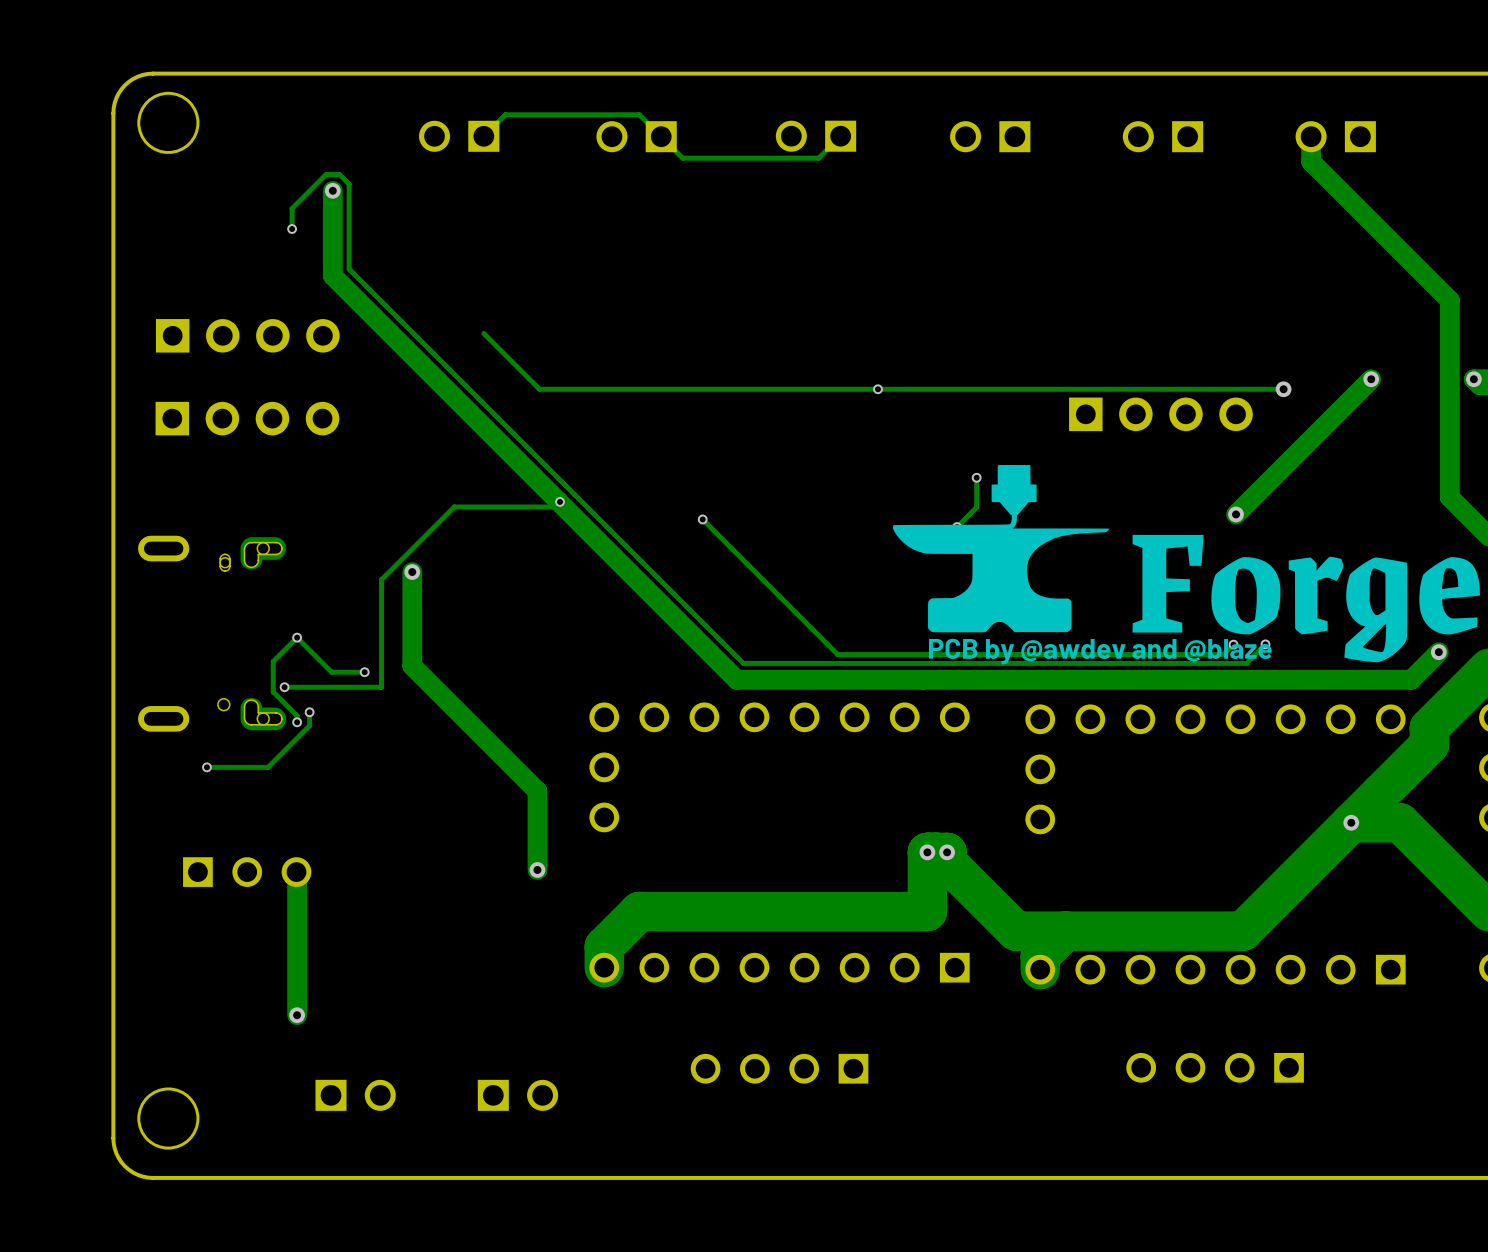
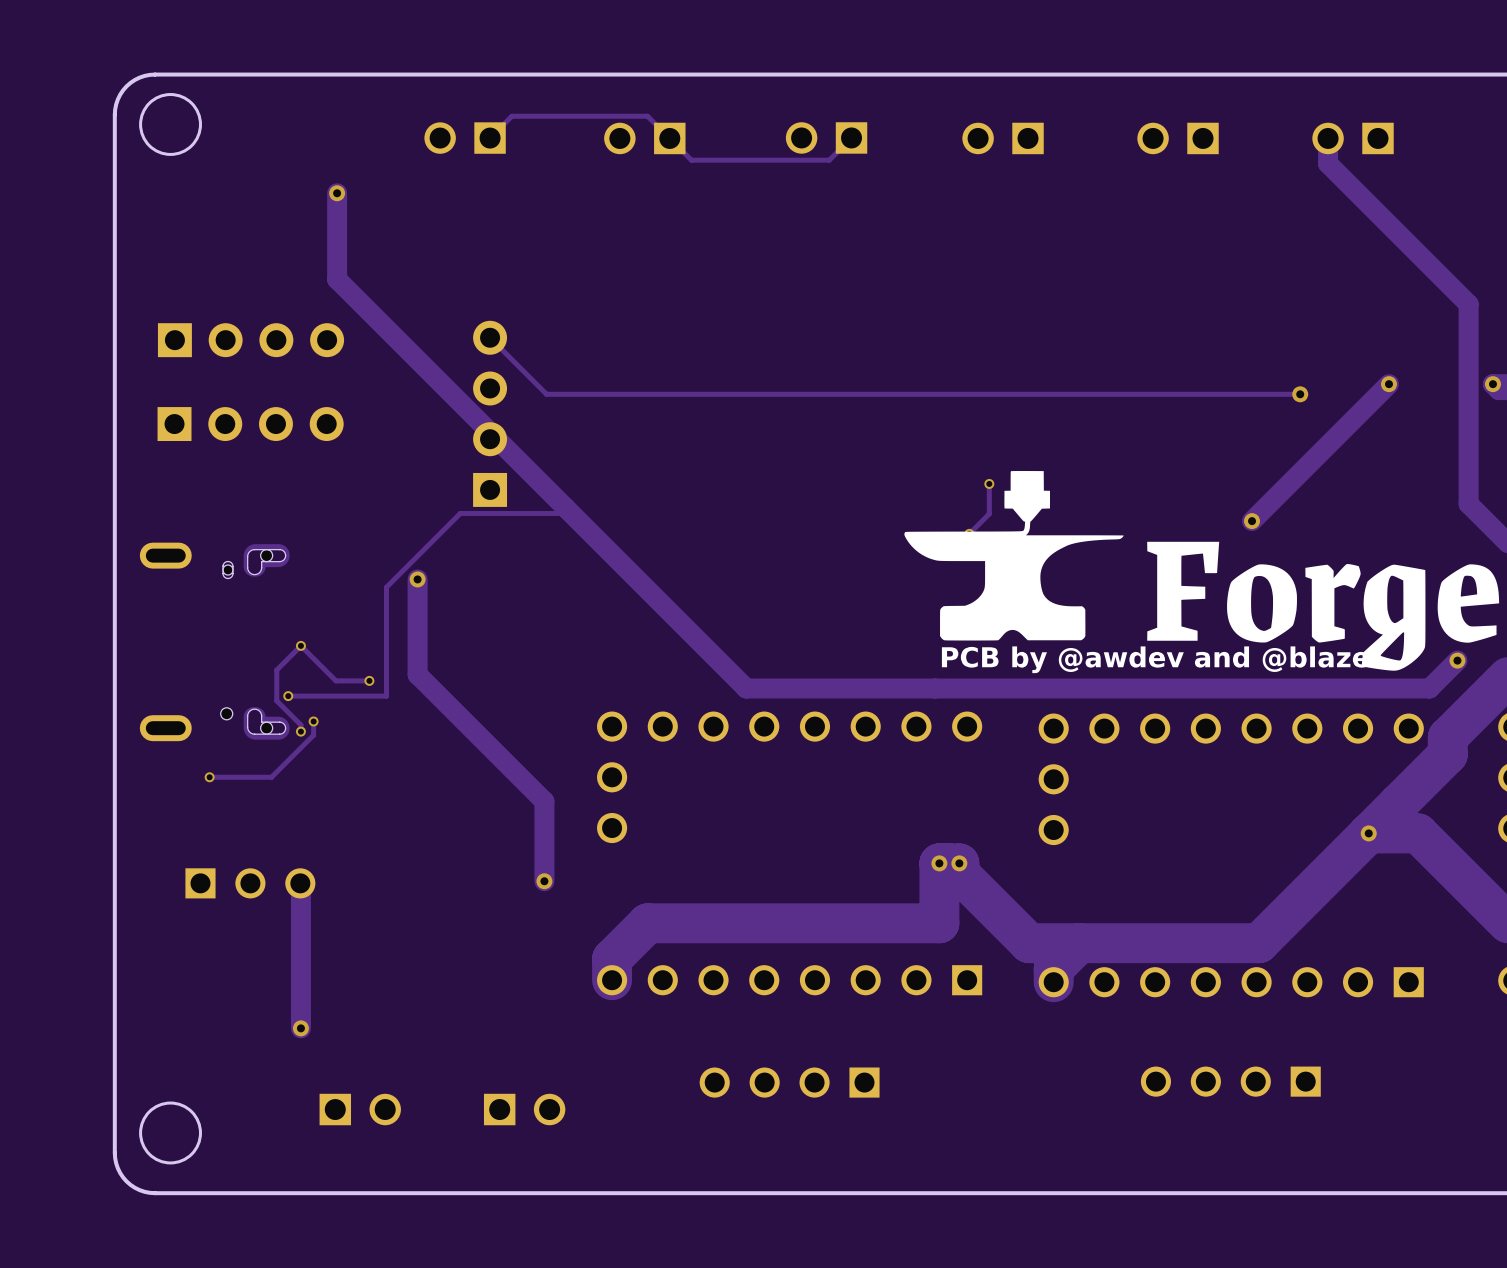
track: (292, 229) (292, 208) (326, 174) (339, 174) (349, 184) (349, 269) (743, 663) (1246, 663) (1265, 644) -> none
via: (292, 229) -> none
via: (877, 389) -> none
part: none -> (490, 413)
part: (1160, 414) -> none
via: (560, 501) -> none
track: (702, 519) (837, 654) (1223, 654) (1233, 644) -> none
via: (702, 519) -> none
via: (1233, 644) -> none
via: (1265, 644) -> none

